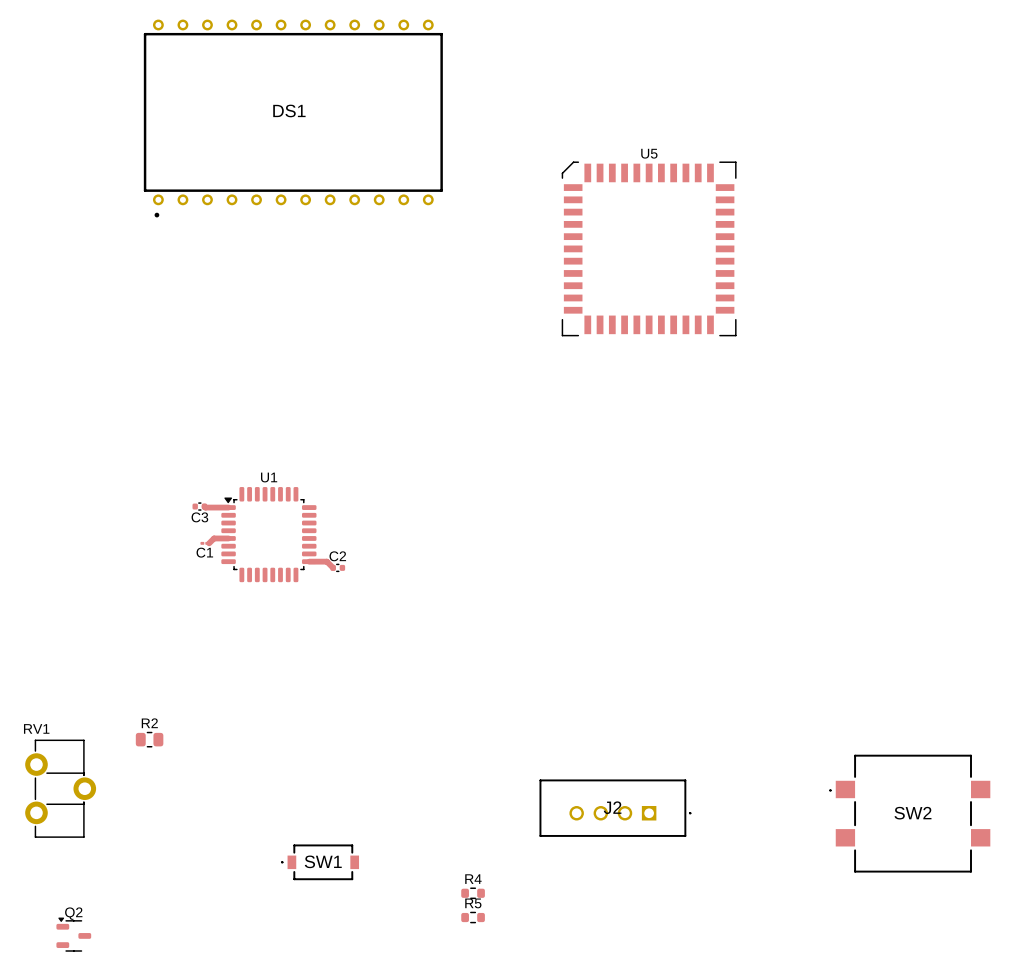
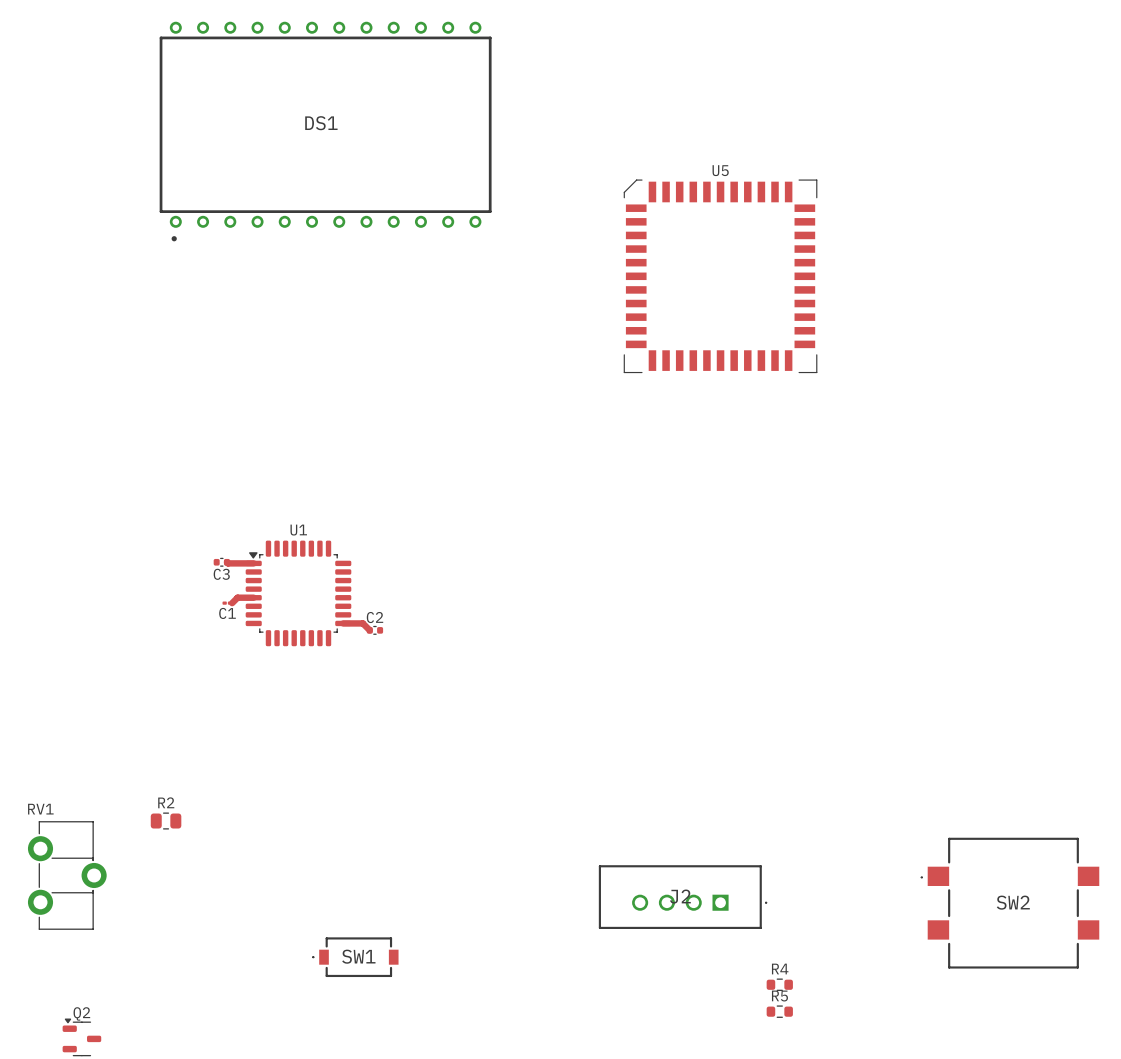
R4 position: (473, 893) -> (779, 984)
R5 position: (473, 917) -> (779, 1011)

